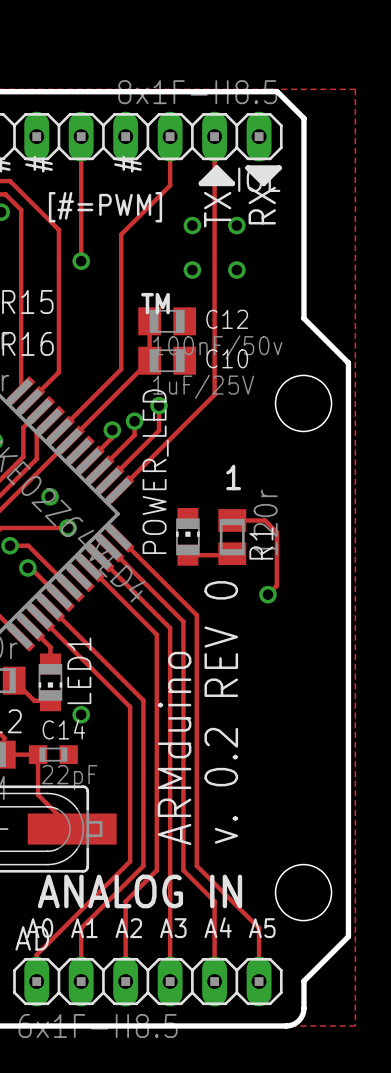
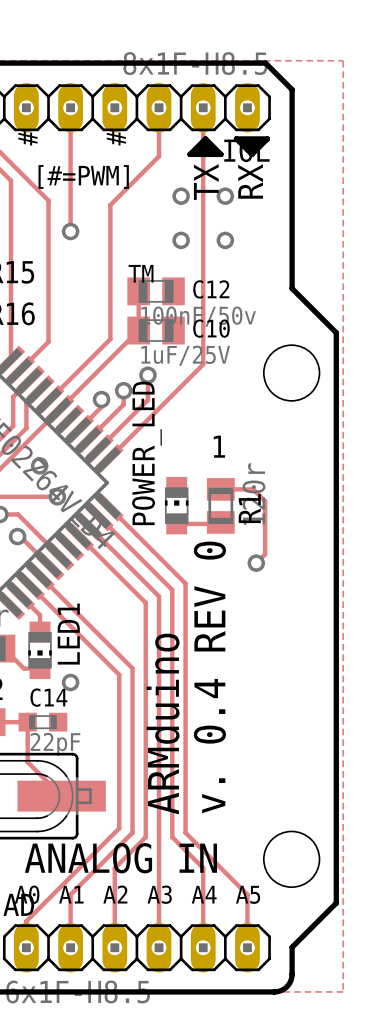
text: v. 0.2 REV 0 (221, 712) -> v. 0.4 REV 0 (209, 677)

